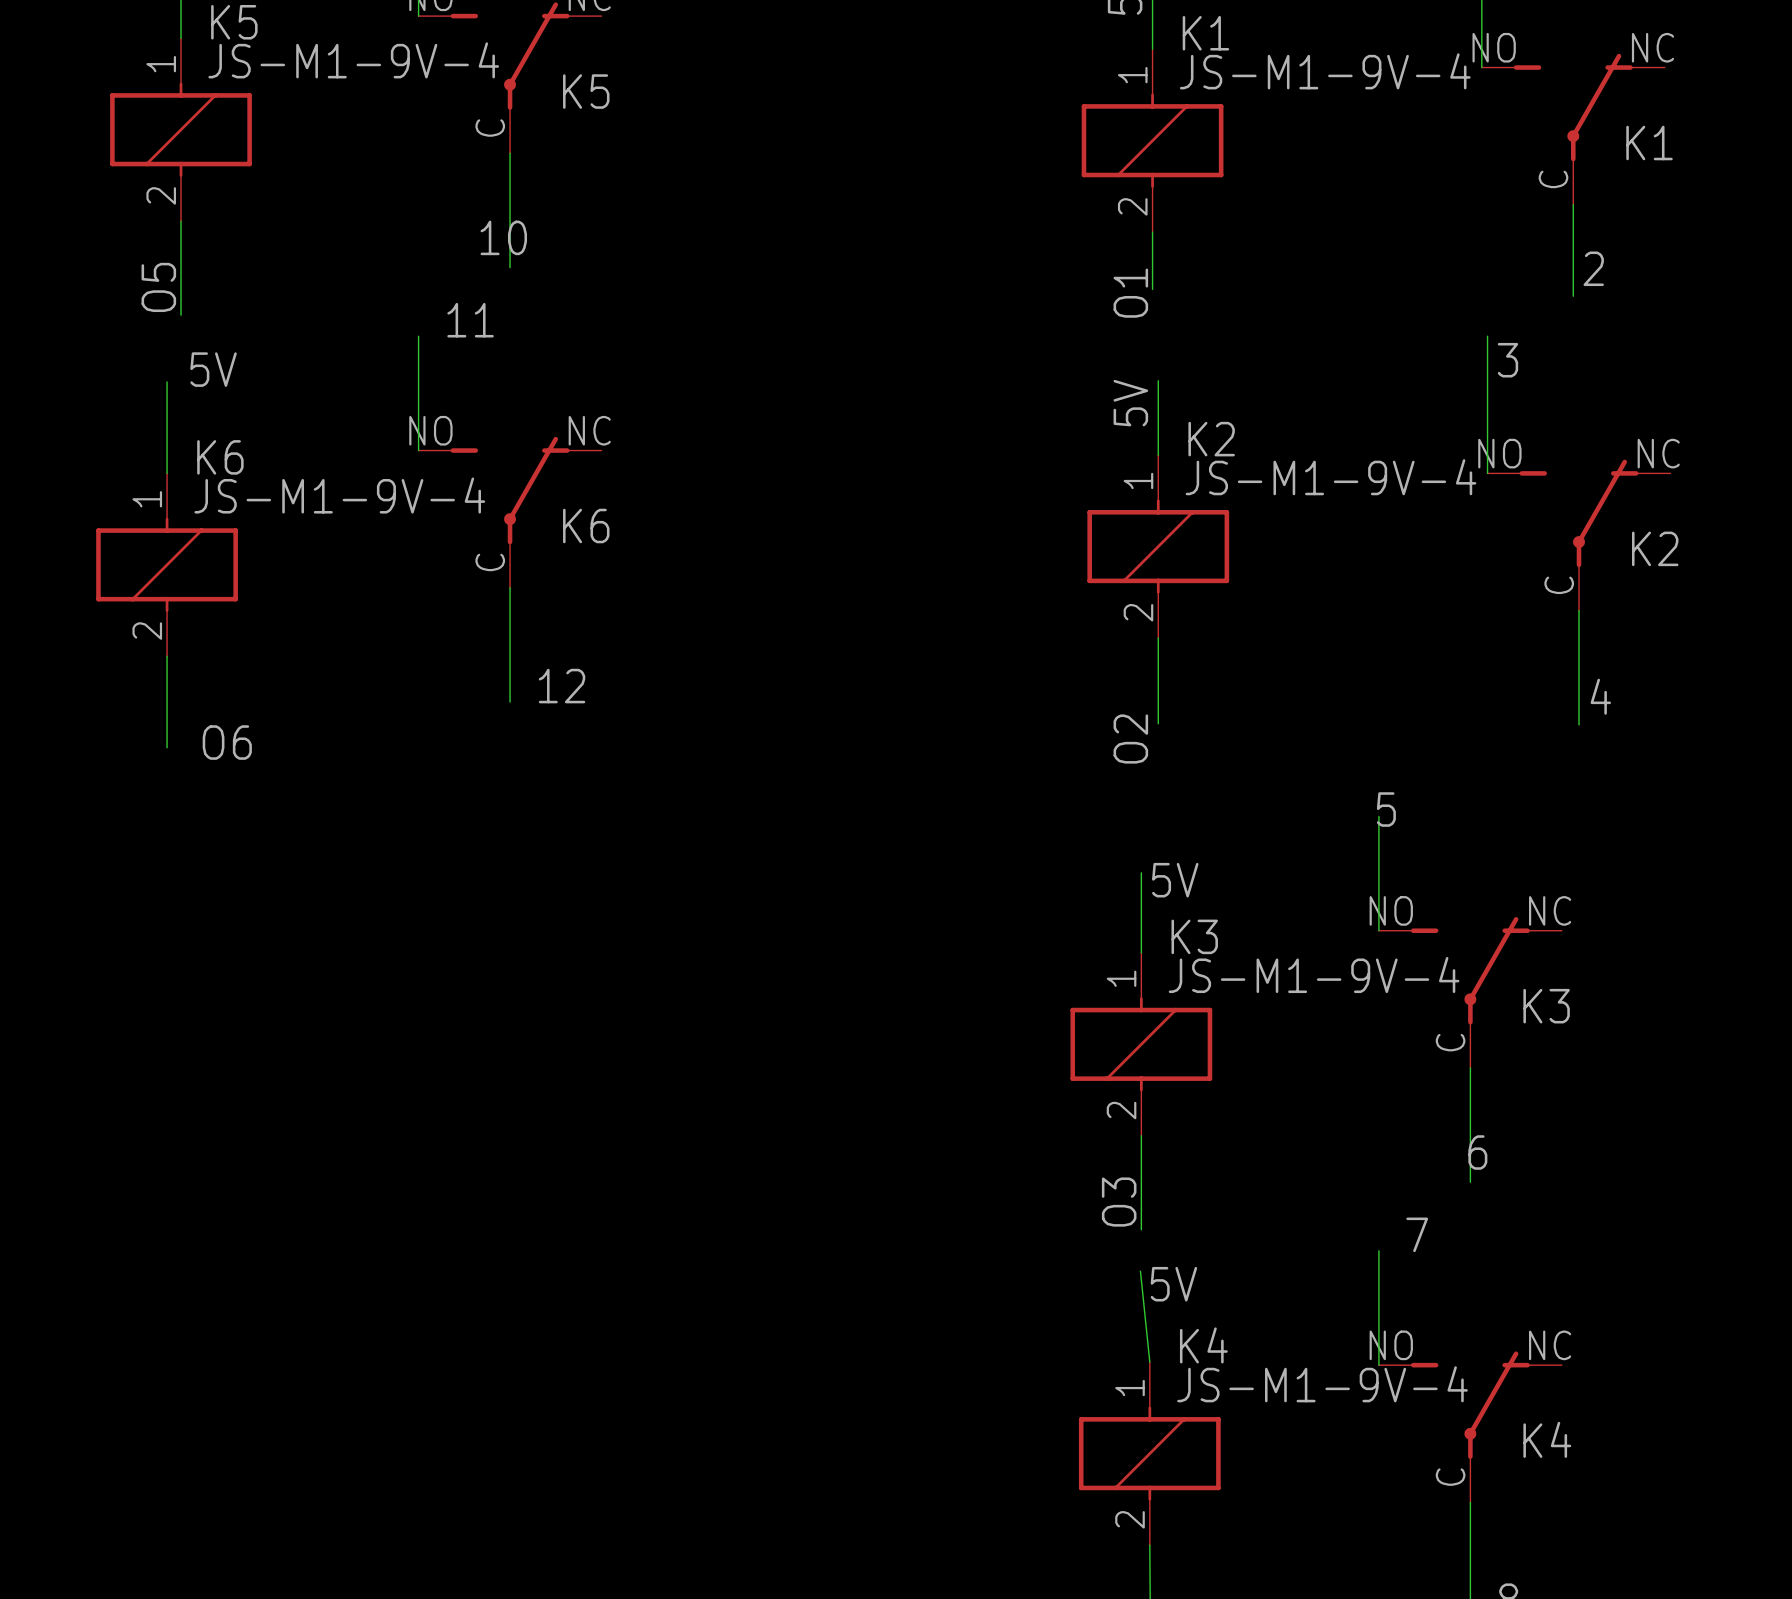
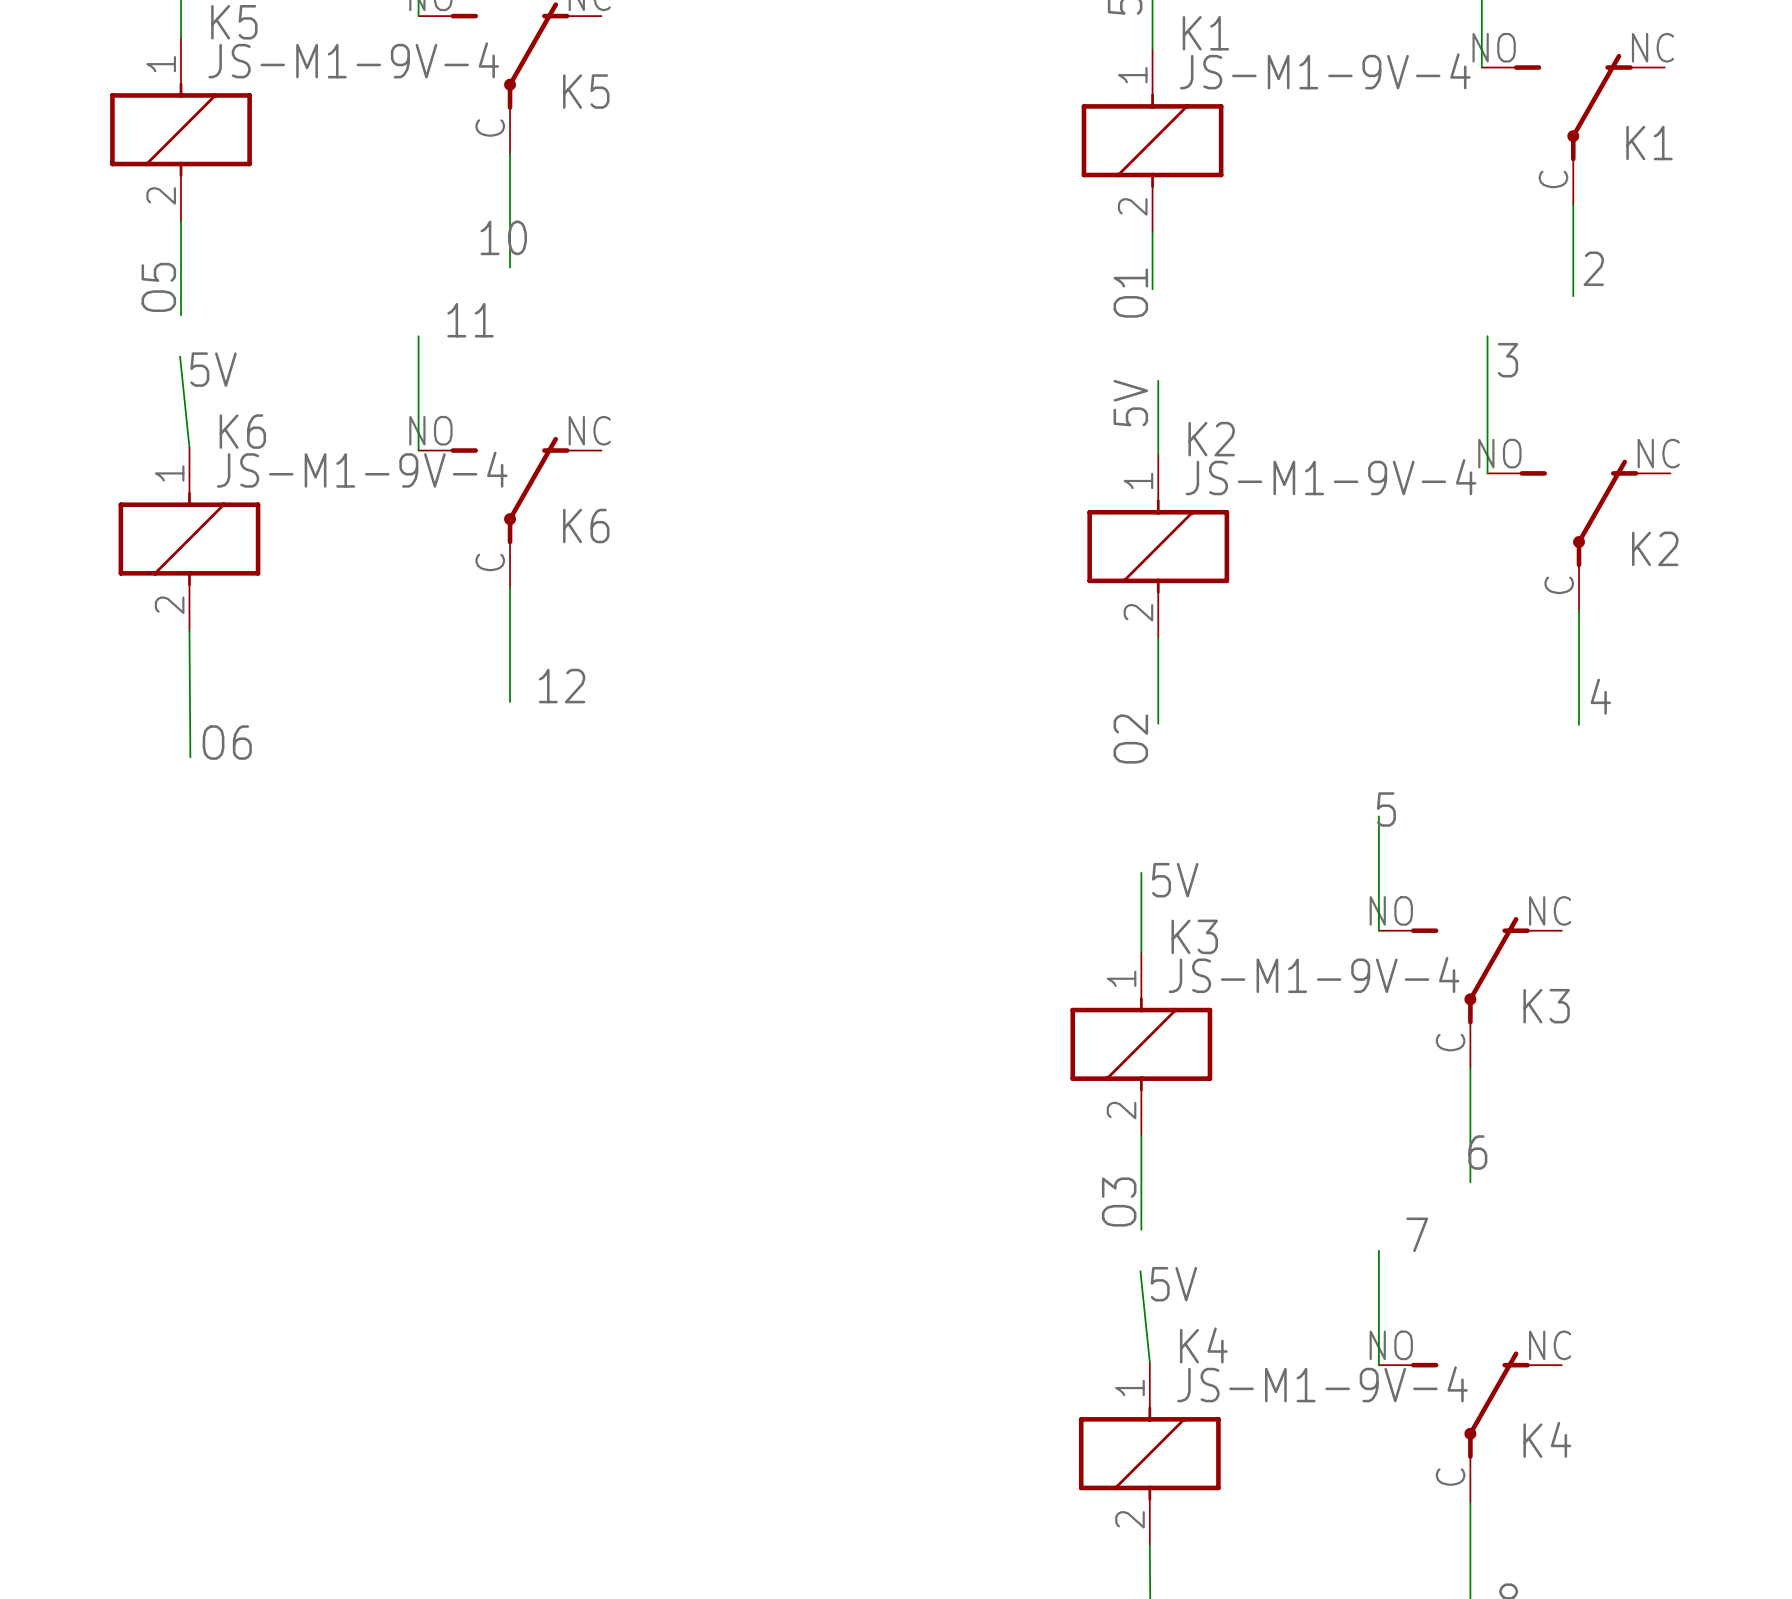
wire: none -> (180, 356) (189, 447)
wire: (167, 381) (167, 473) -> none
K6 position: (167, 564) -> (189, 539)
wire: none -> (189, 630) (190, 757)
wire: (167, 656) (167, 747) -> none

